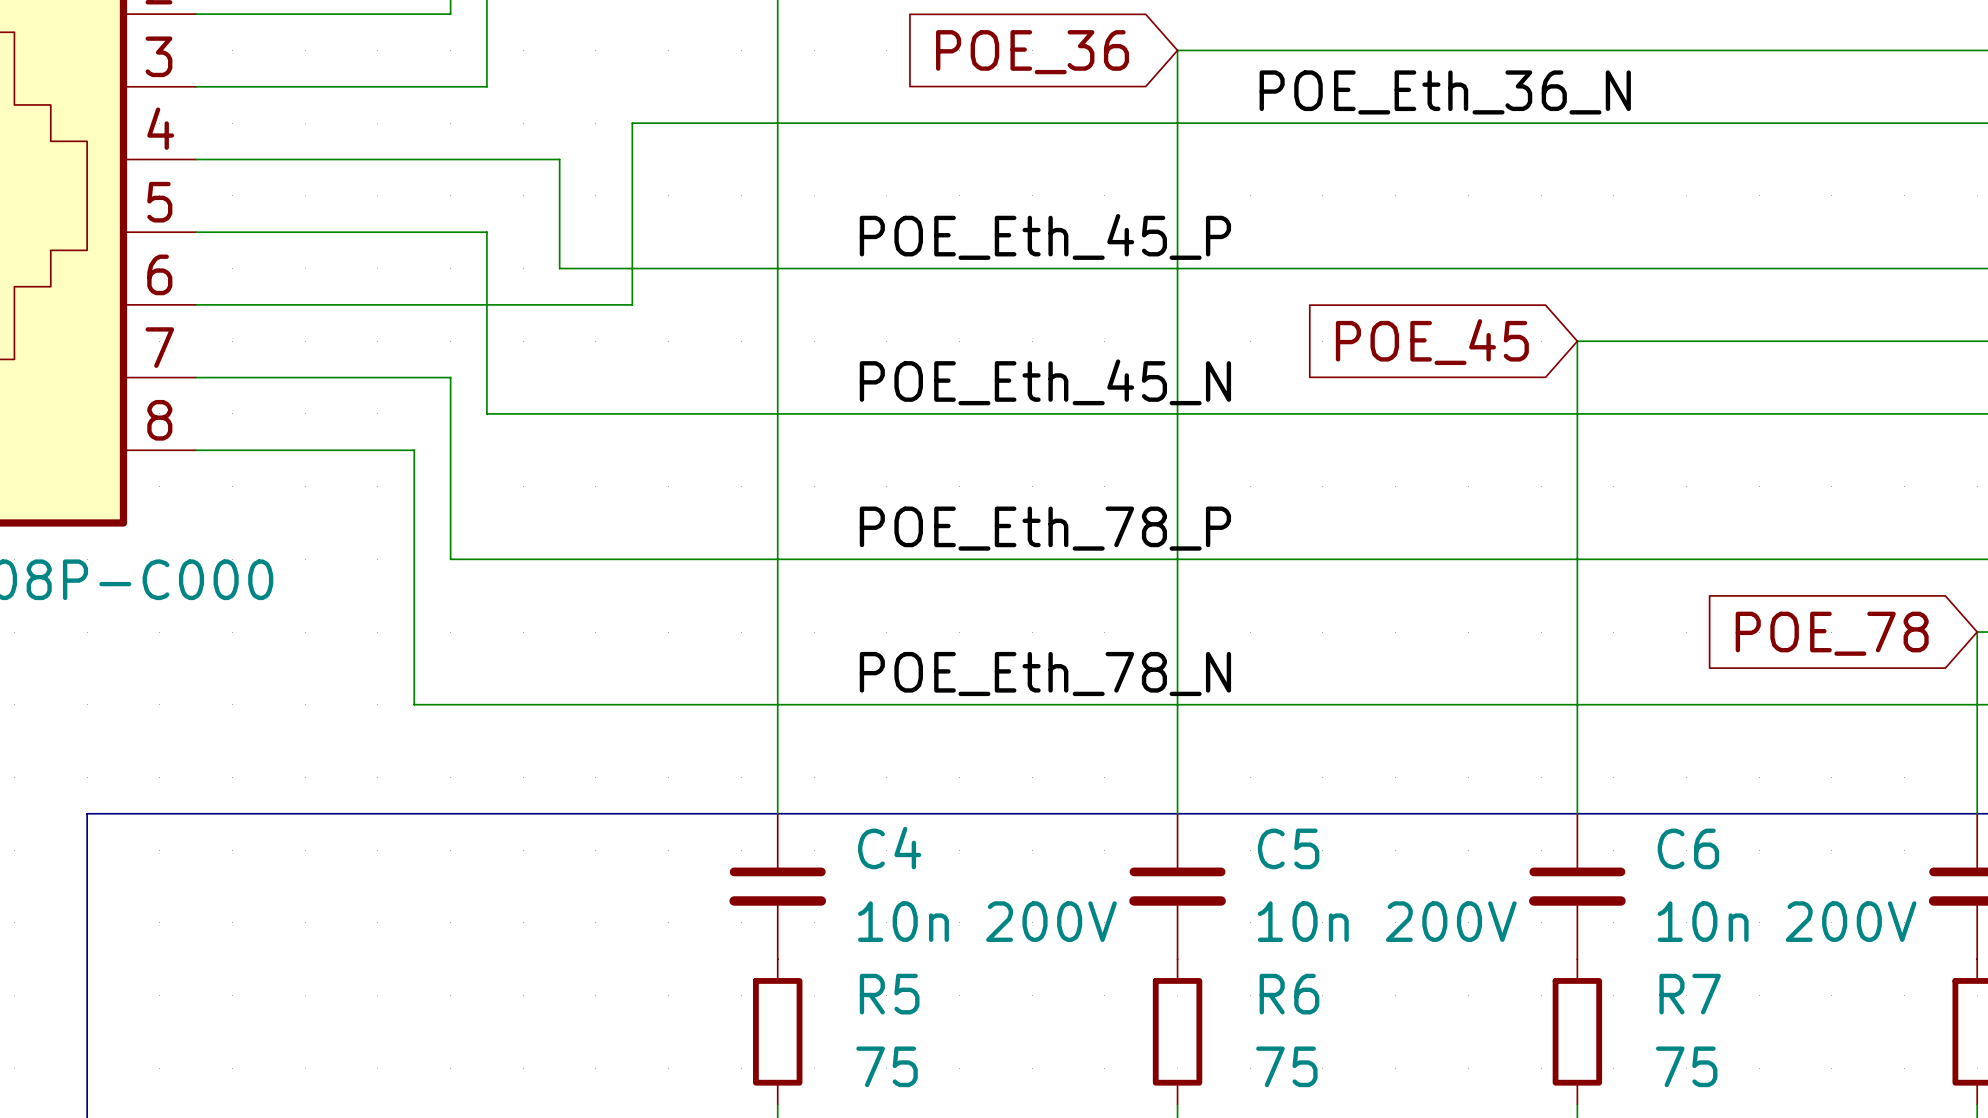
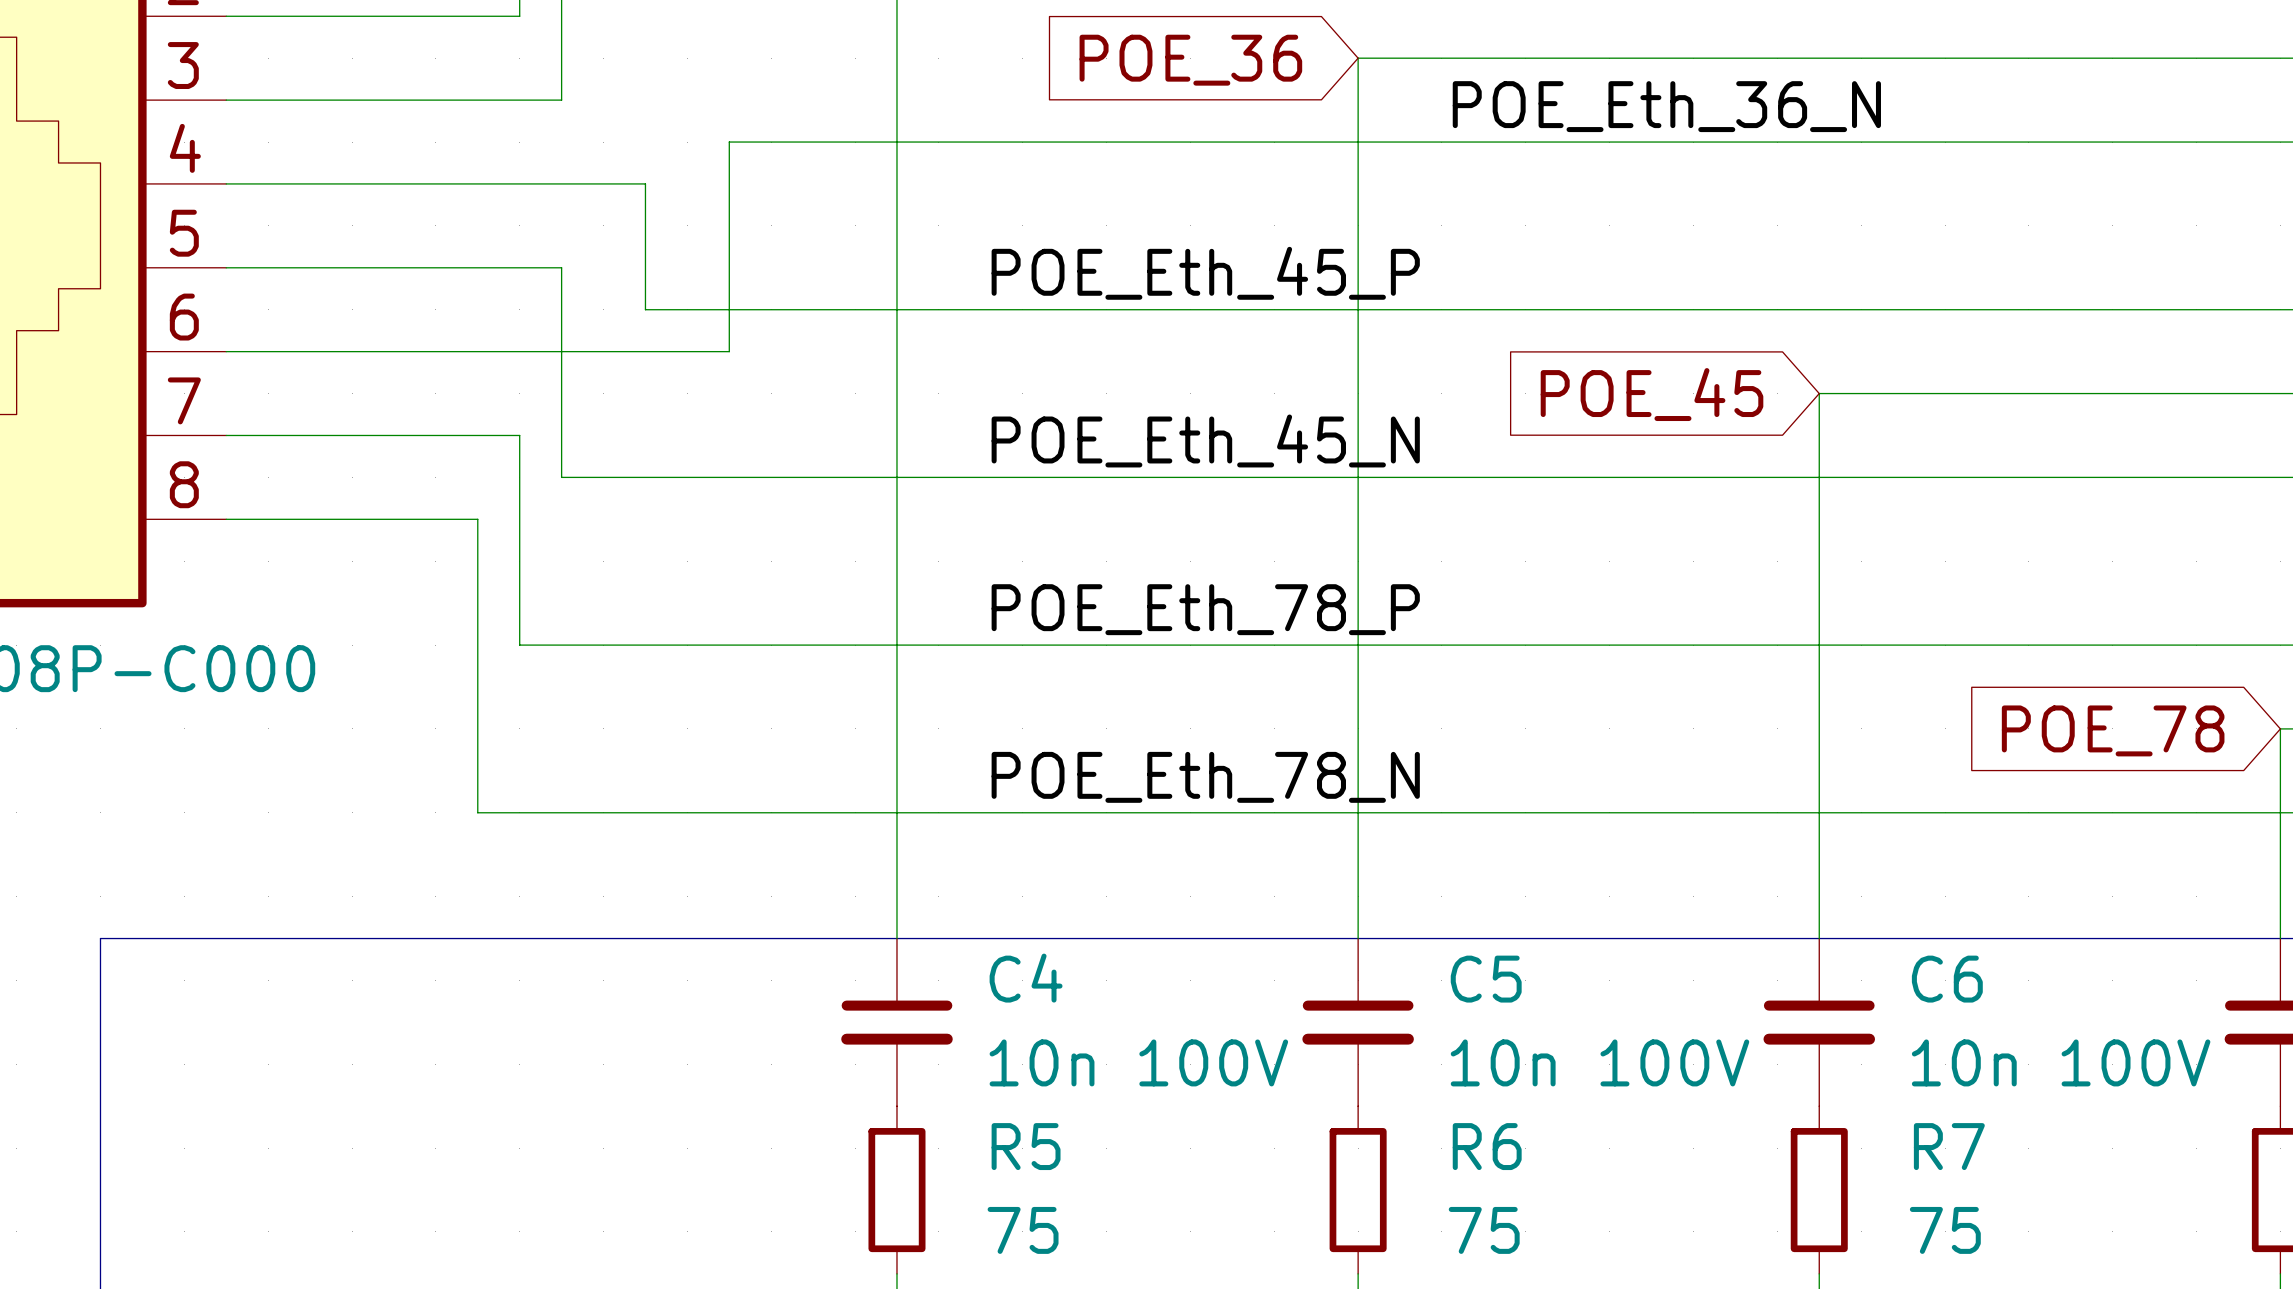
C4 value: 10n 200V (987, 921) -> 10n 100V (1138, 1062)
C5 value: 10n 200V (1387, 921) -> 10n 100V (1599, 1062)
C6 value: 10n 200V (1787, 921) -> 10n 100V (2061, 1062)

